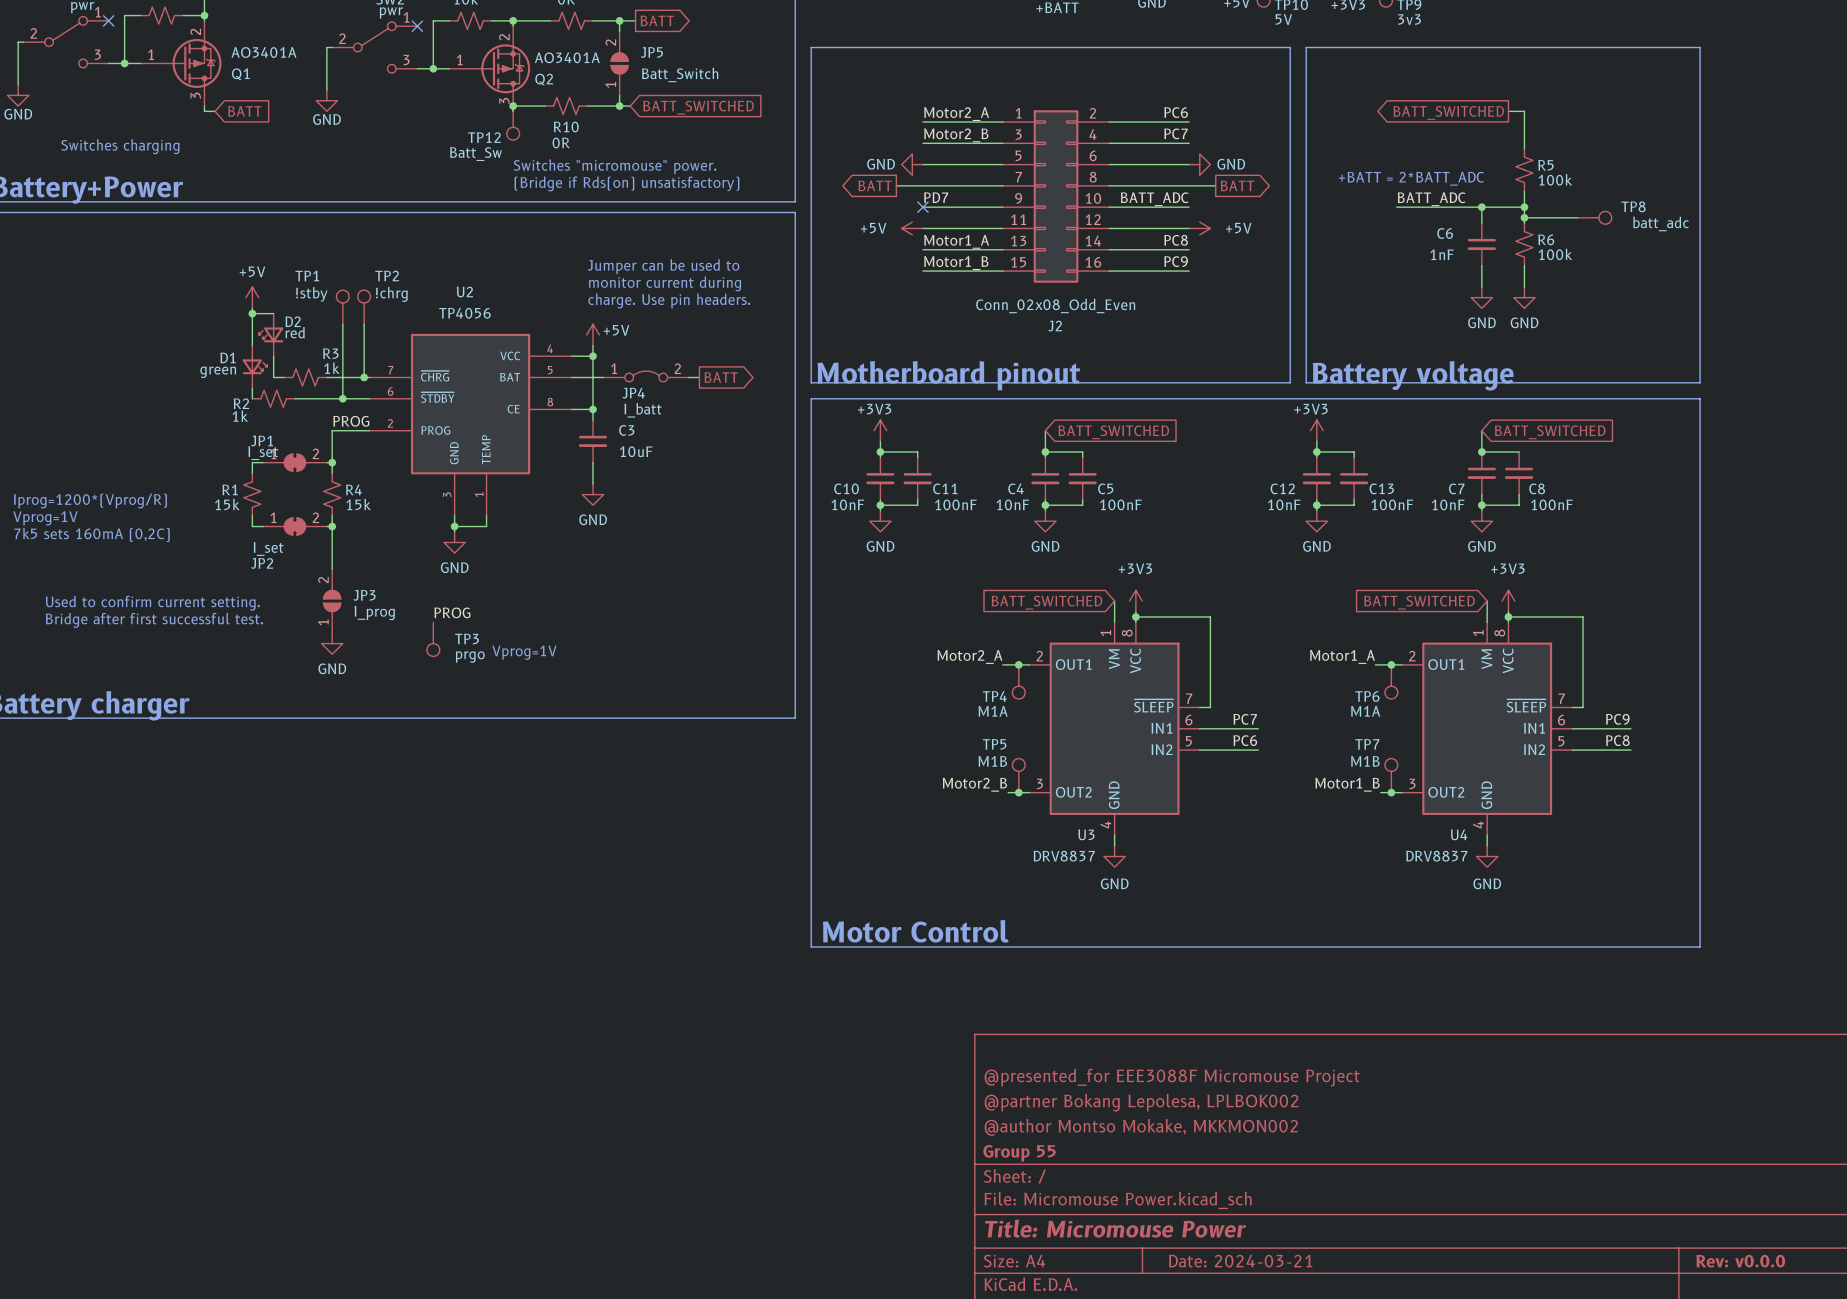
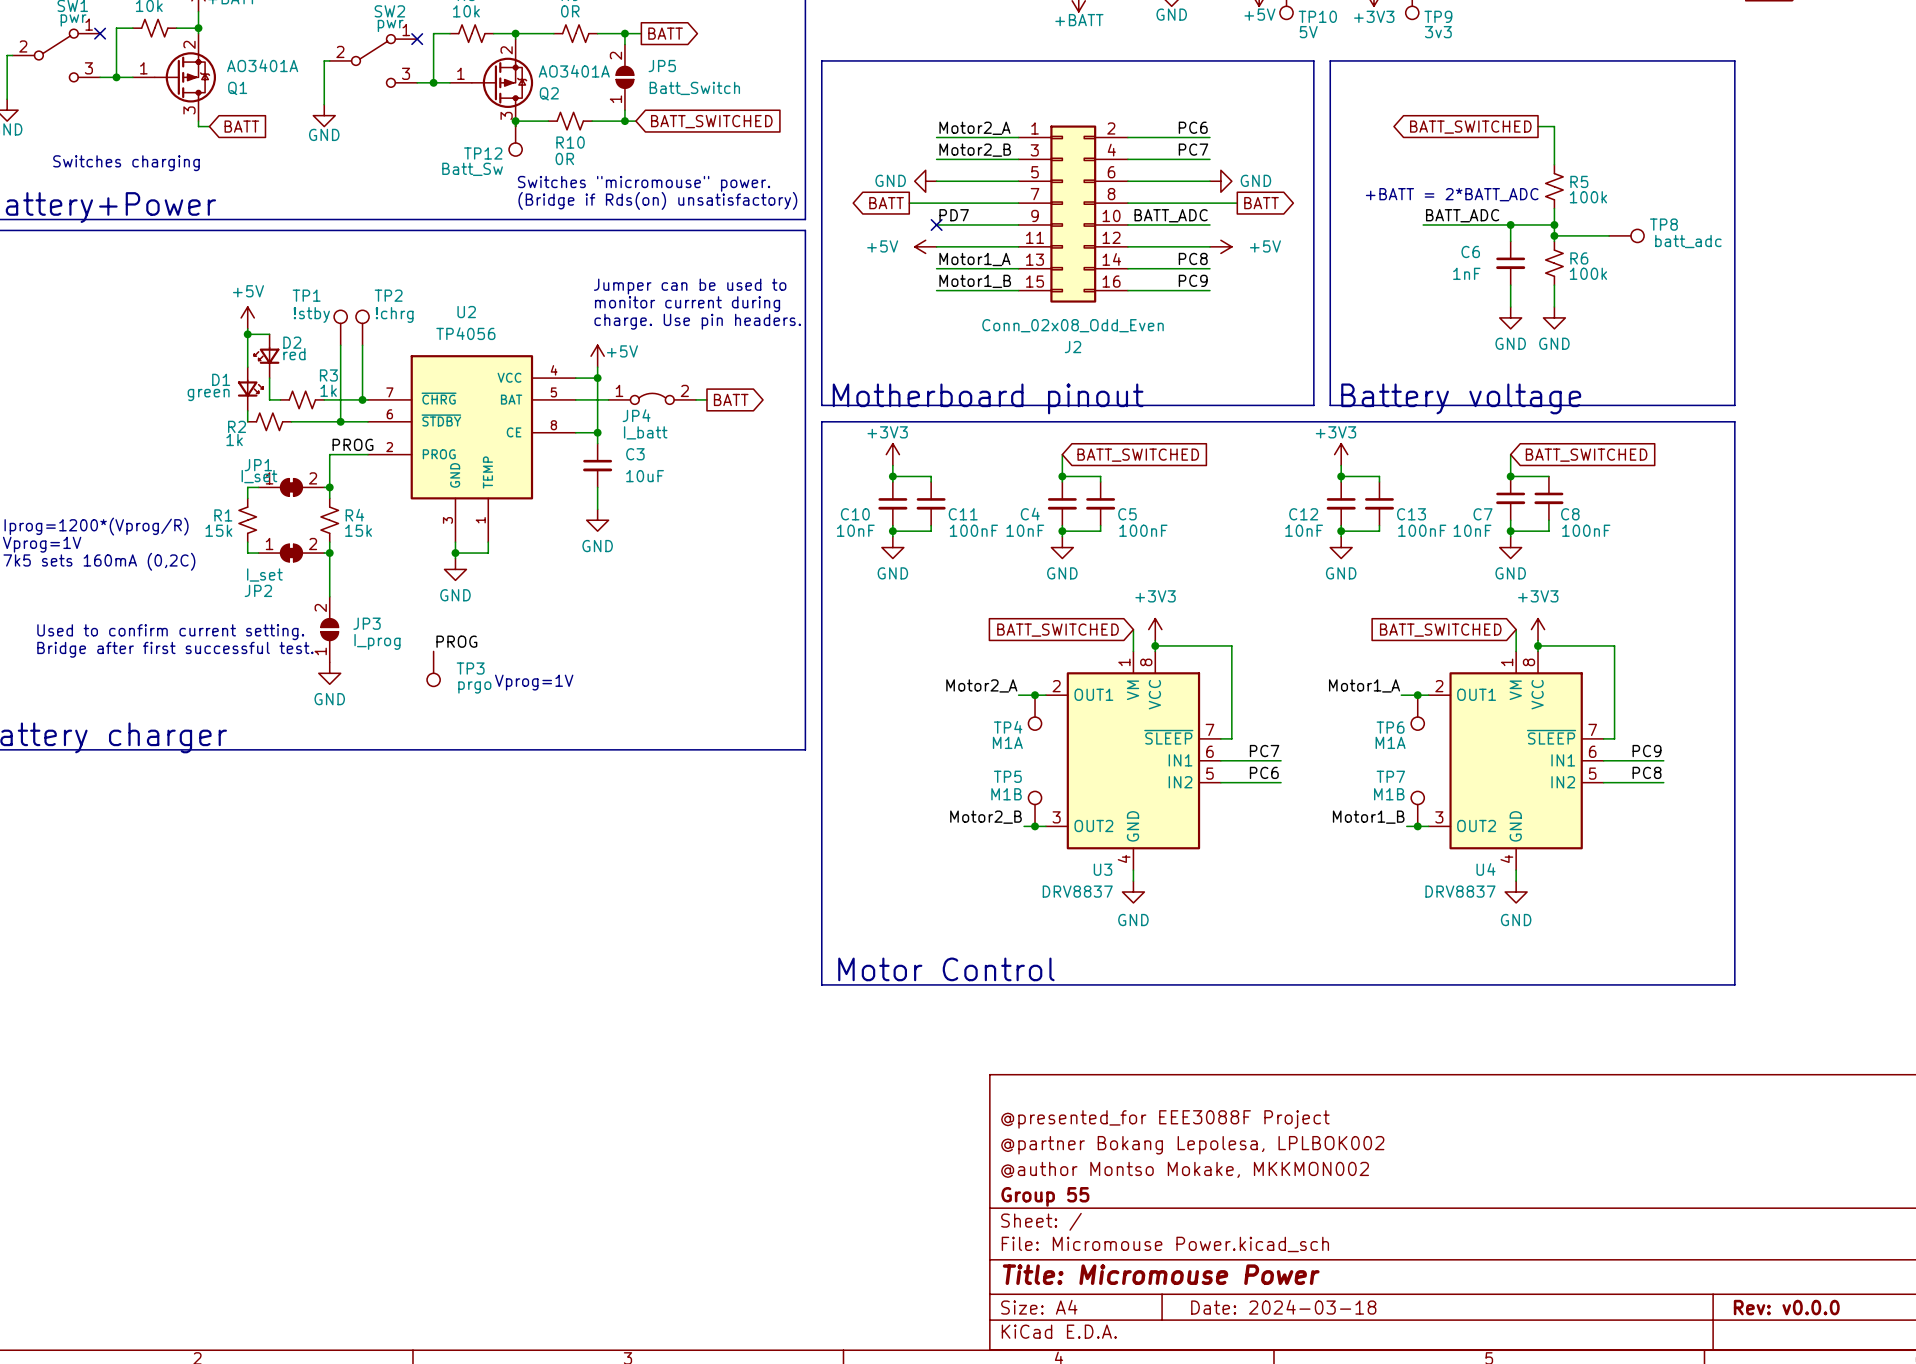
title block: @presented_for EEE3088F Micromouse Project (1172, 1077) -> @presented_for EEE3088F Project (1165, 1119)
title block: Date: 2024-03-21 (1240, 1261) -> Date: 2024-03-18 (1283, 1307)

